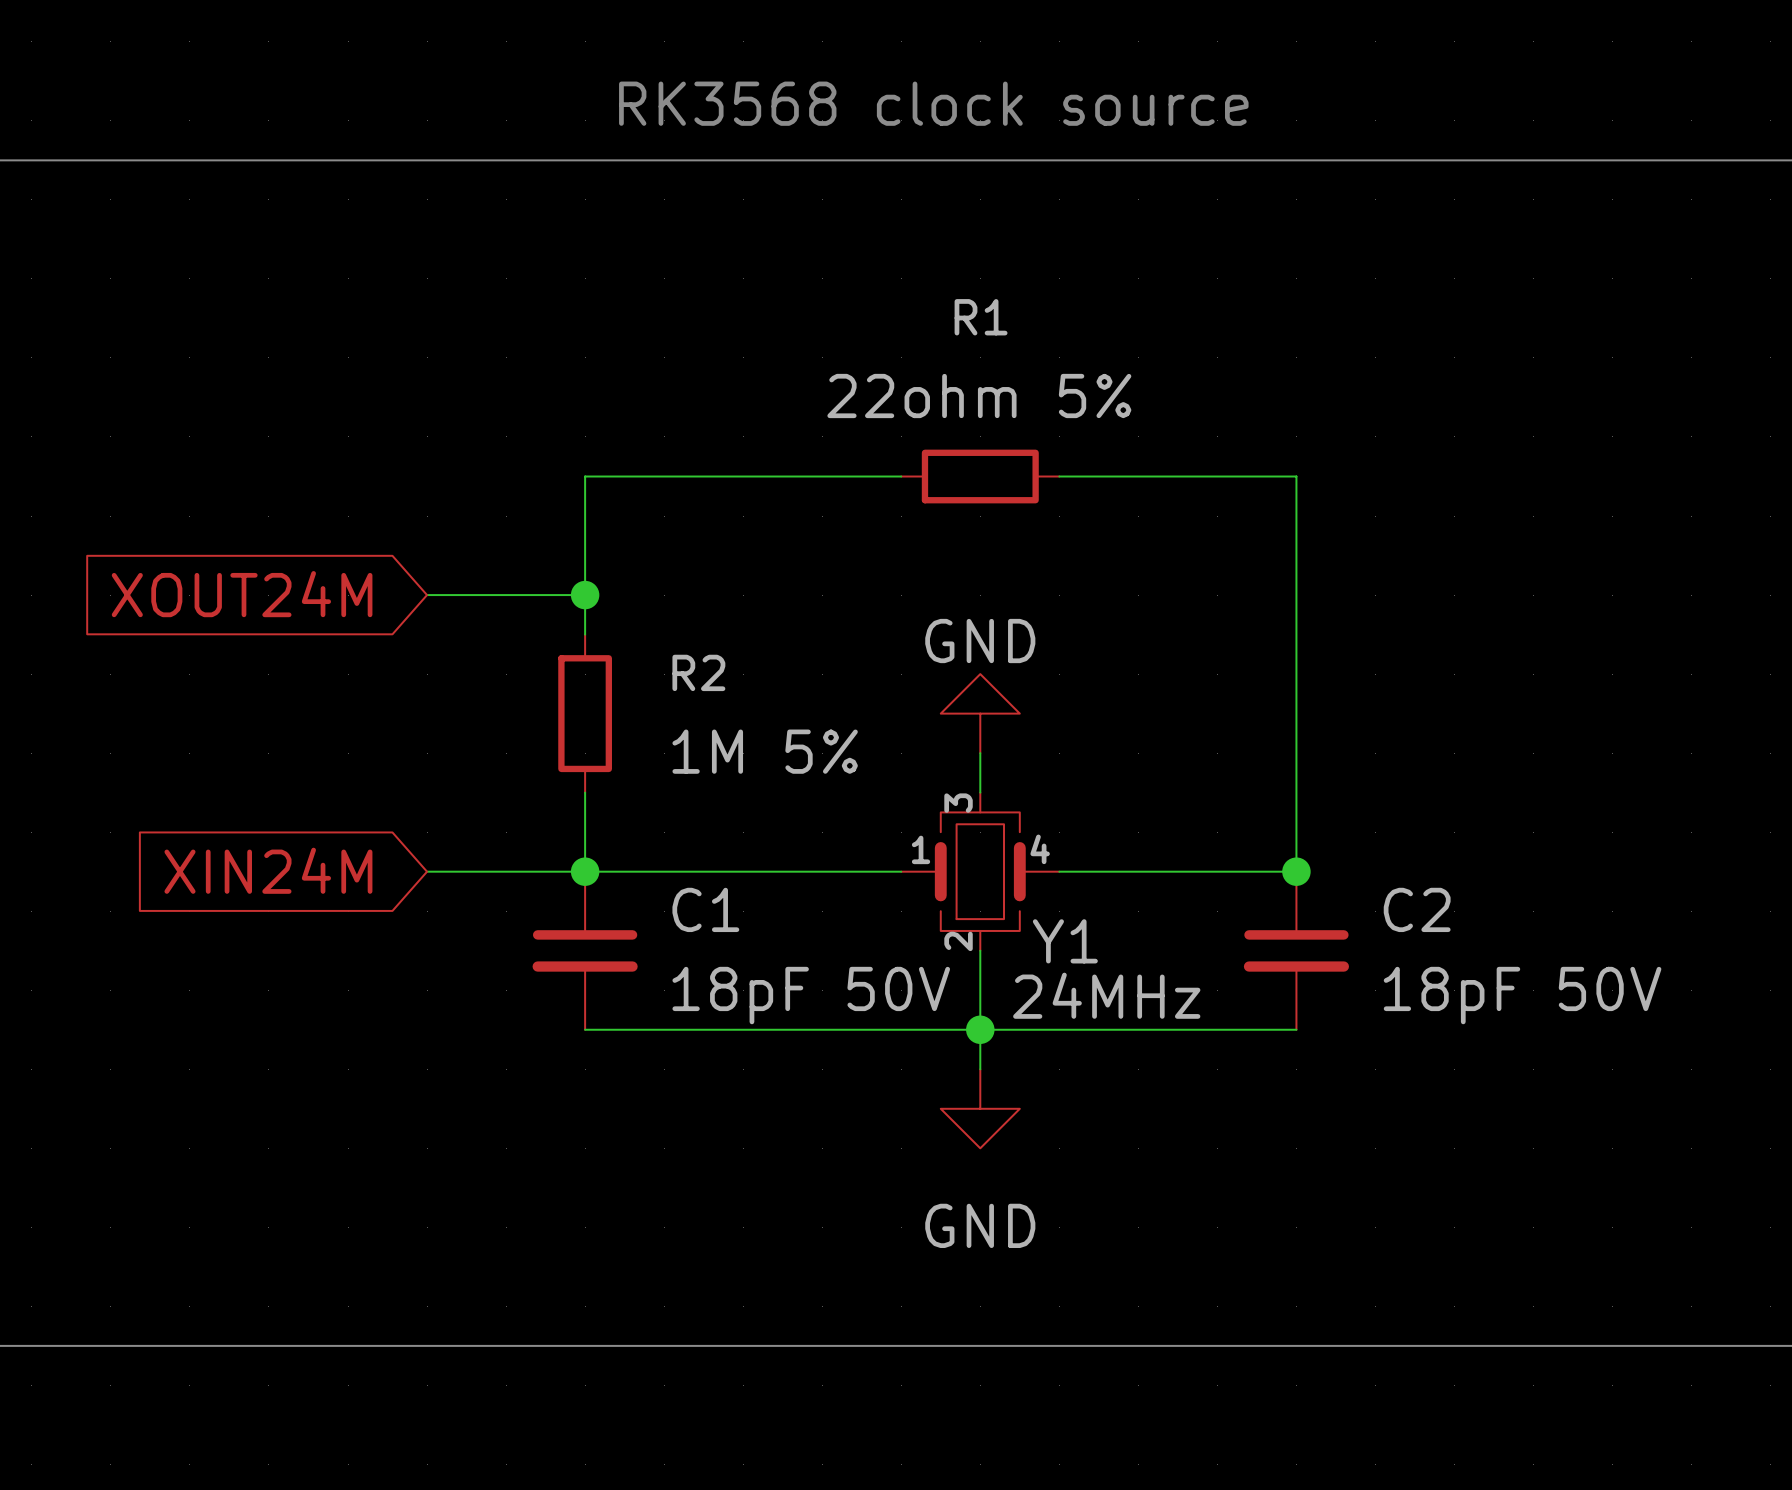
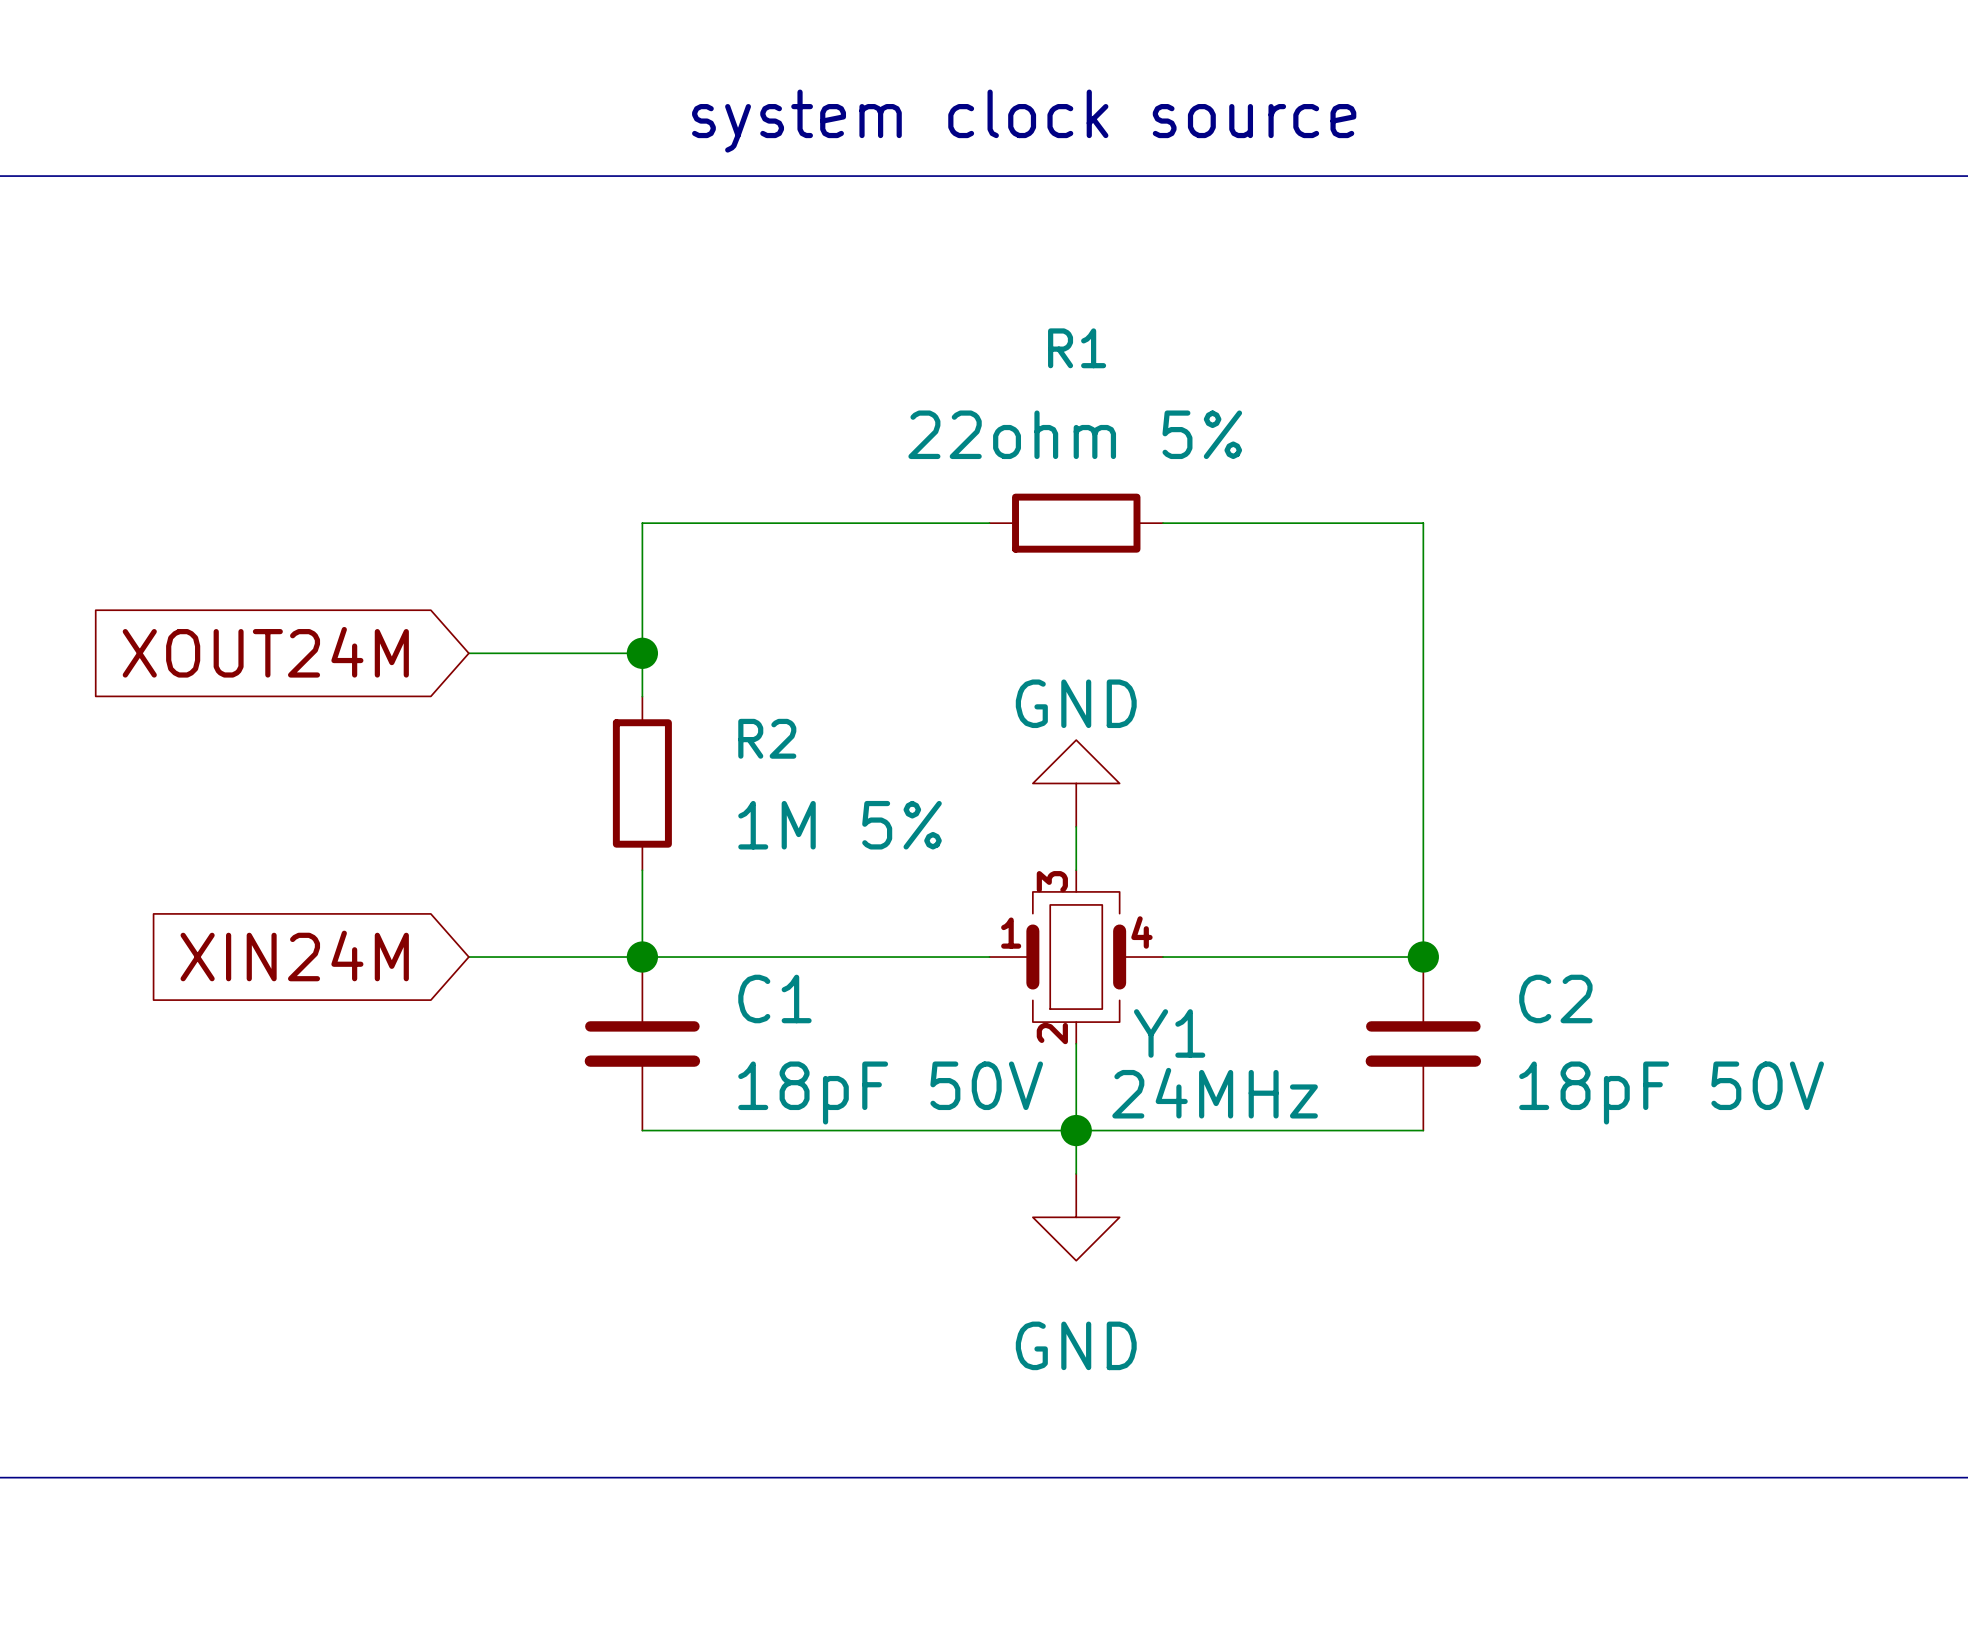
text: RK3568 clock source (933, 103) -> system clock source (1024, 121)

